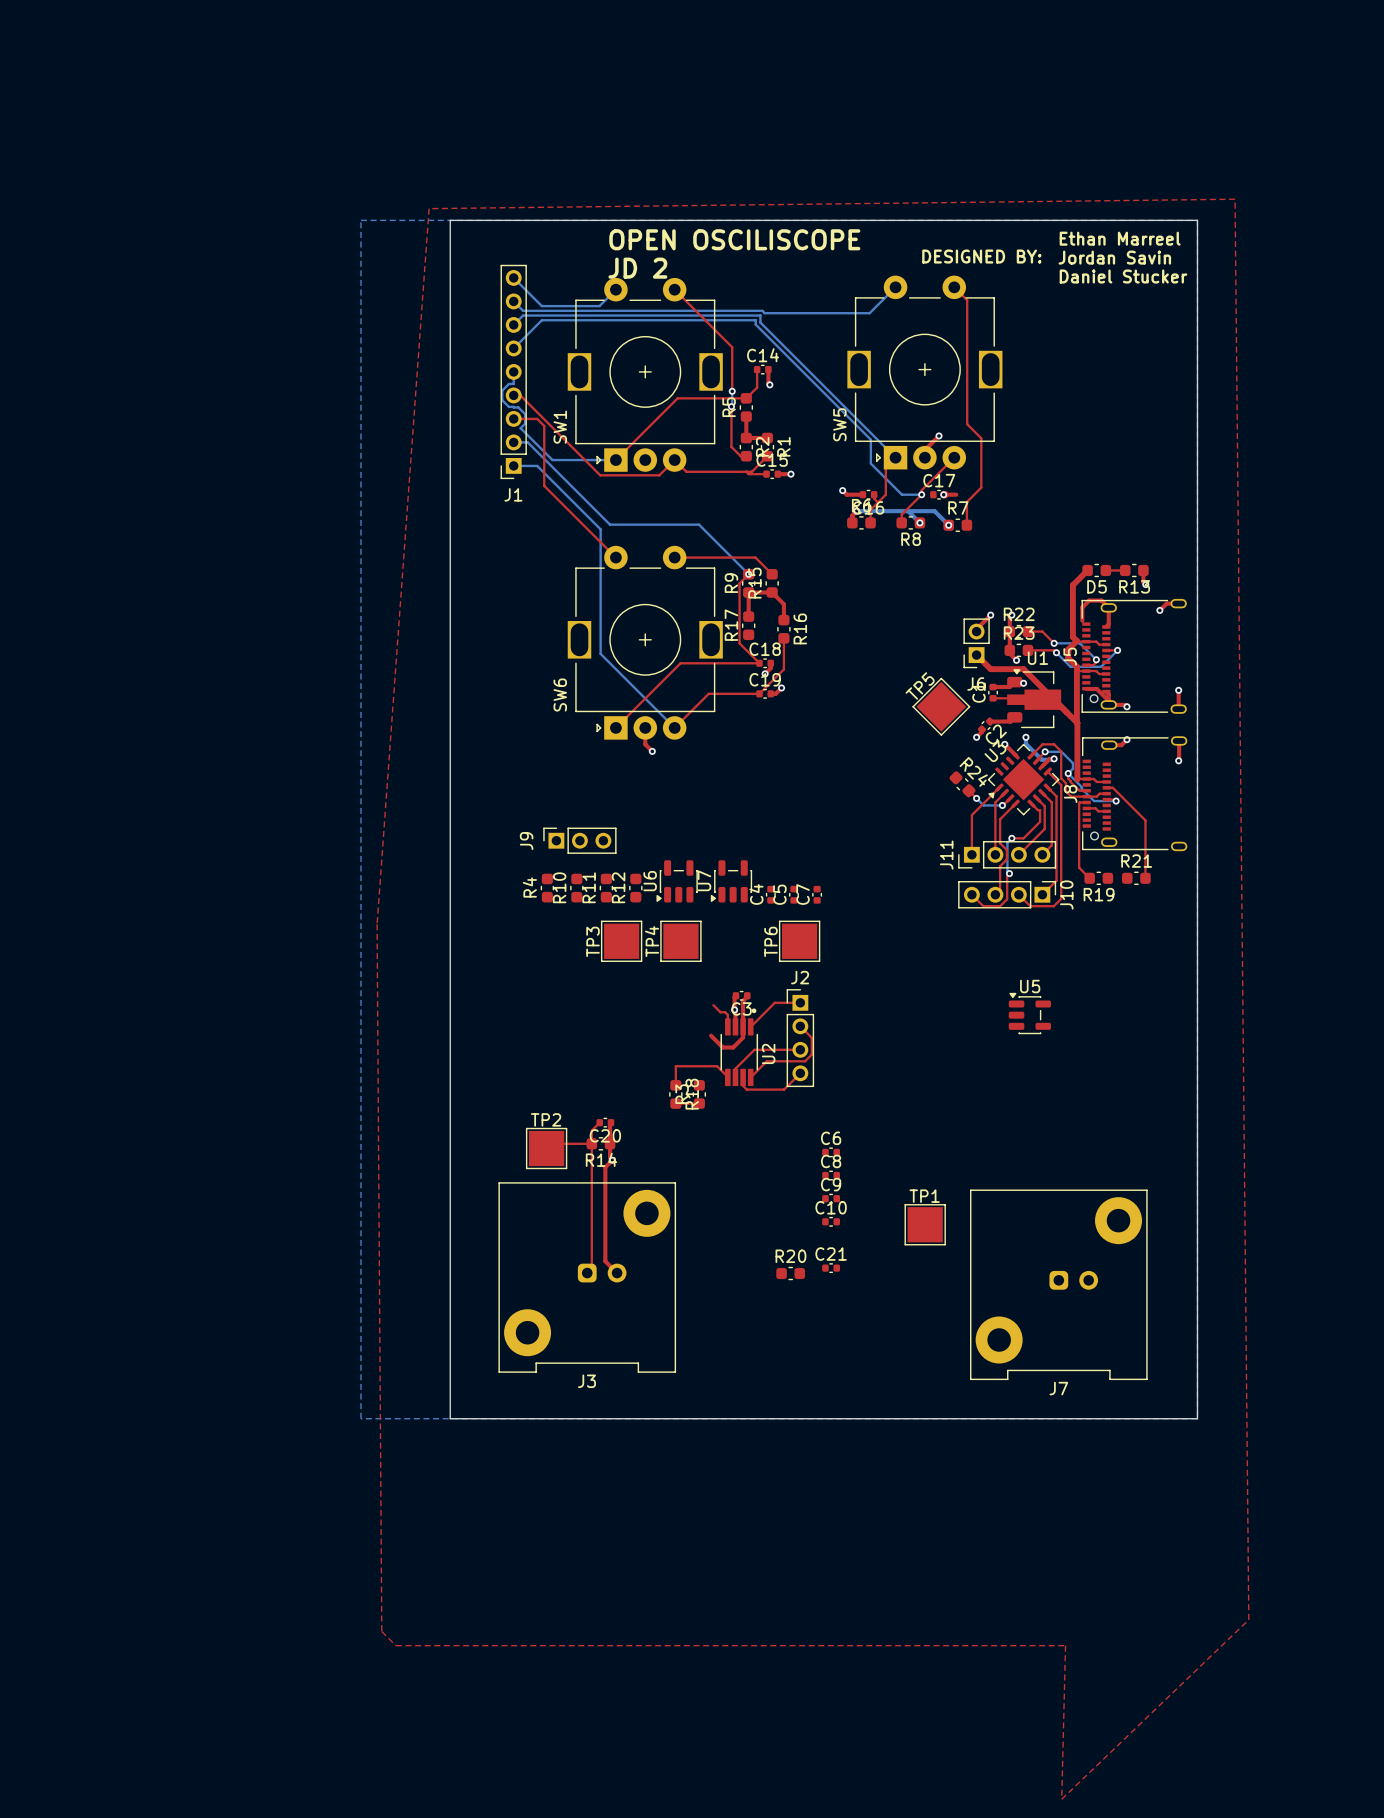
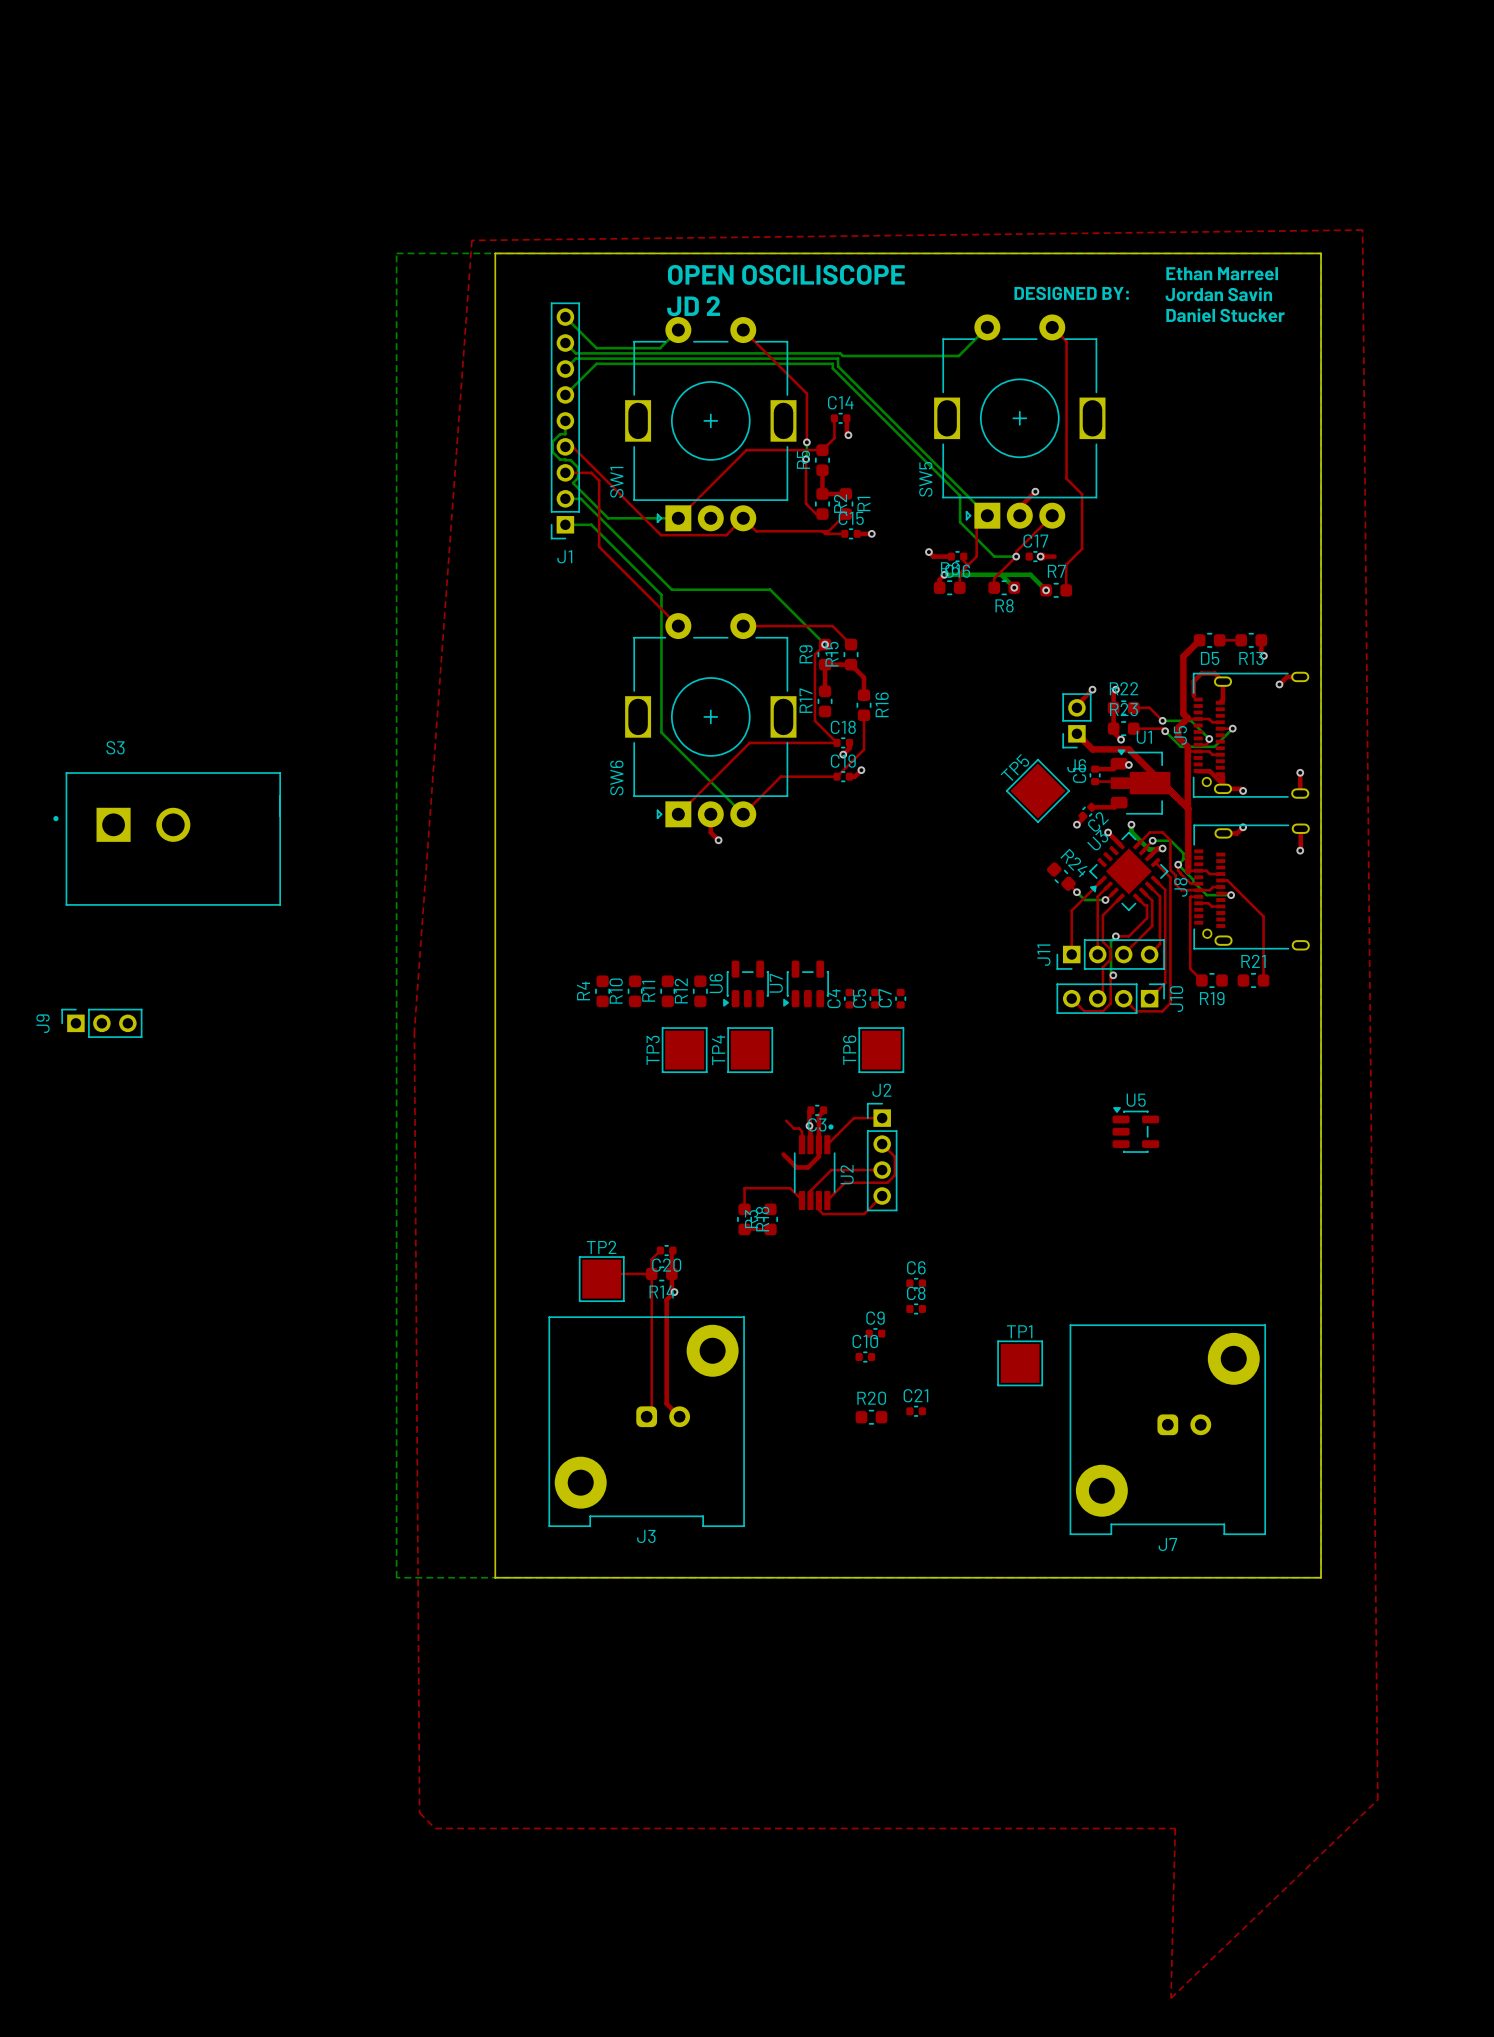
S3: none -> (167, 838)
J9 position: (579, 840) -> (101, 1023)
C9 position: (831, 1198) -> (875, 1333)
C10 position: (831, 1221) -> (865, 1357)

